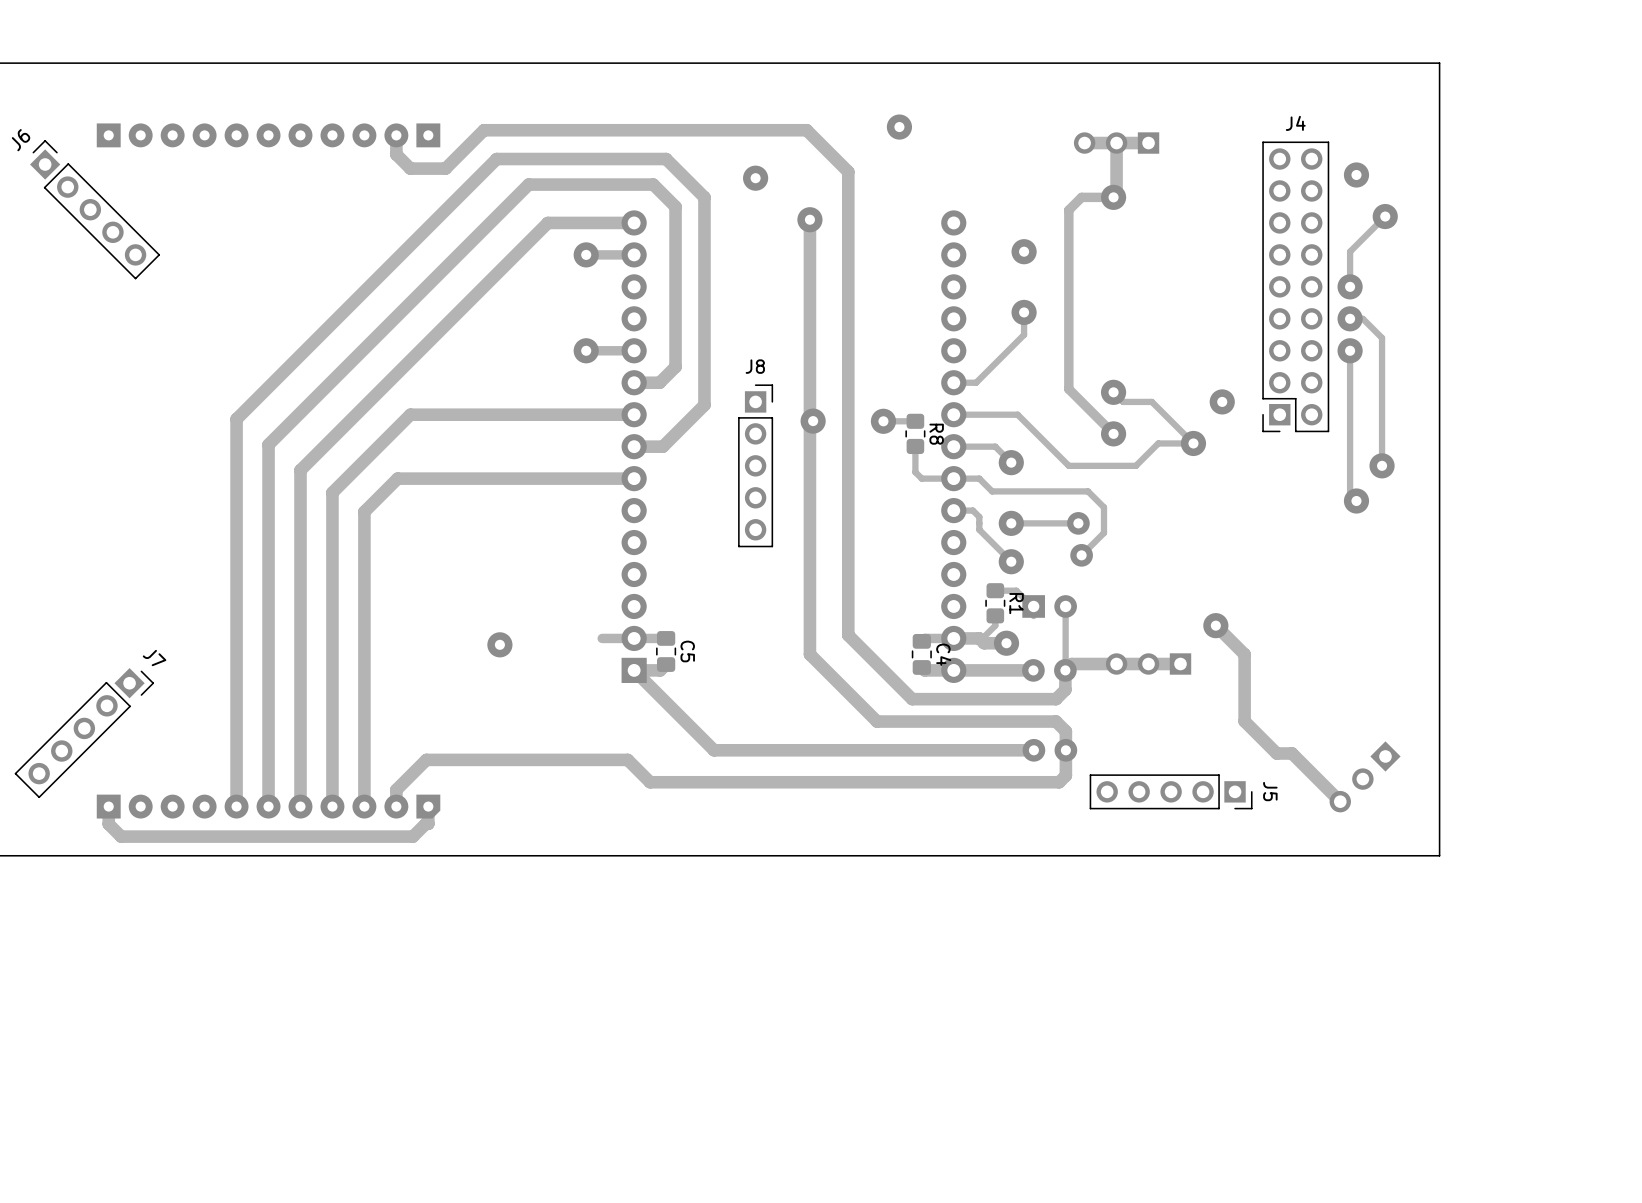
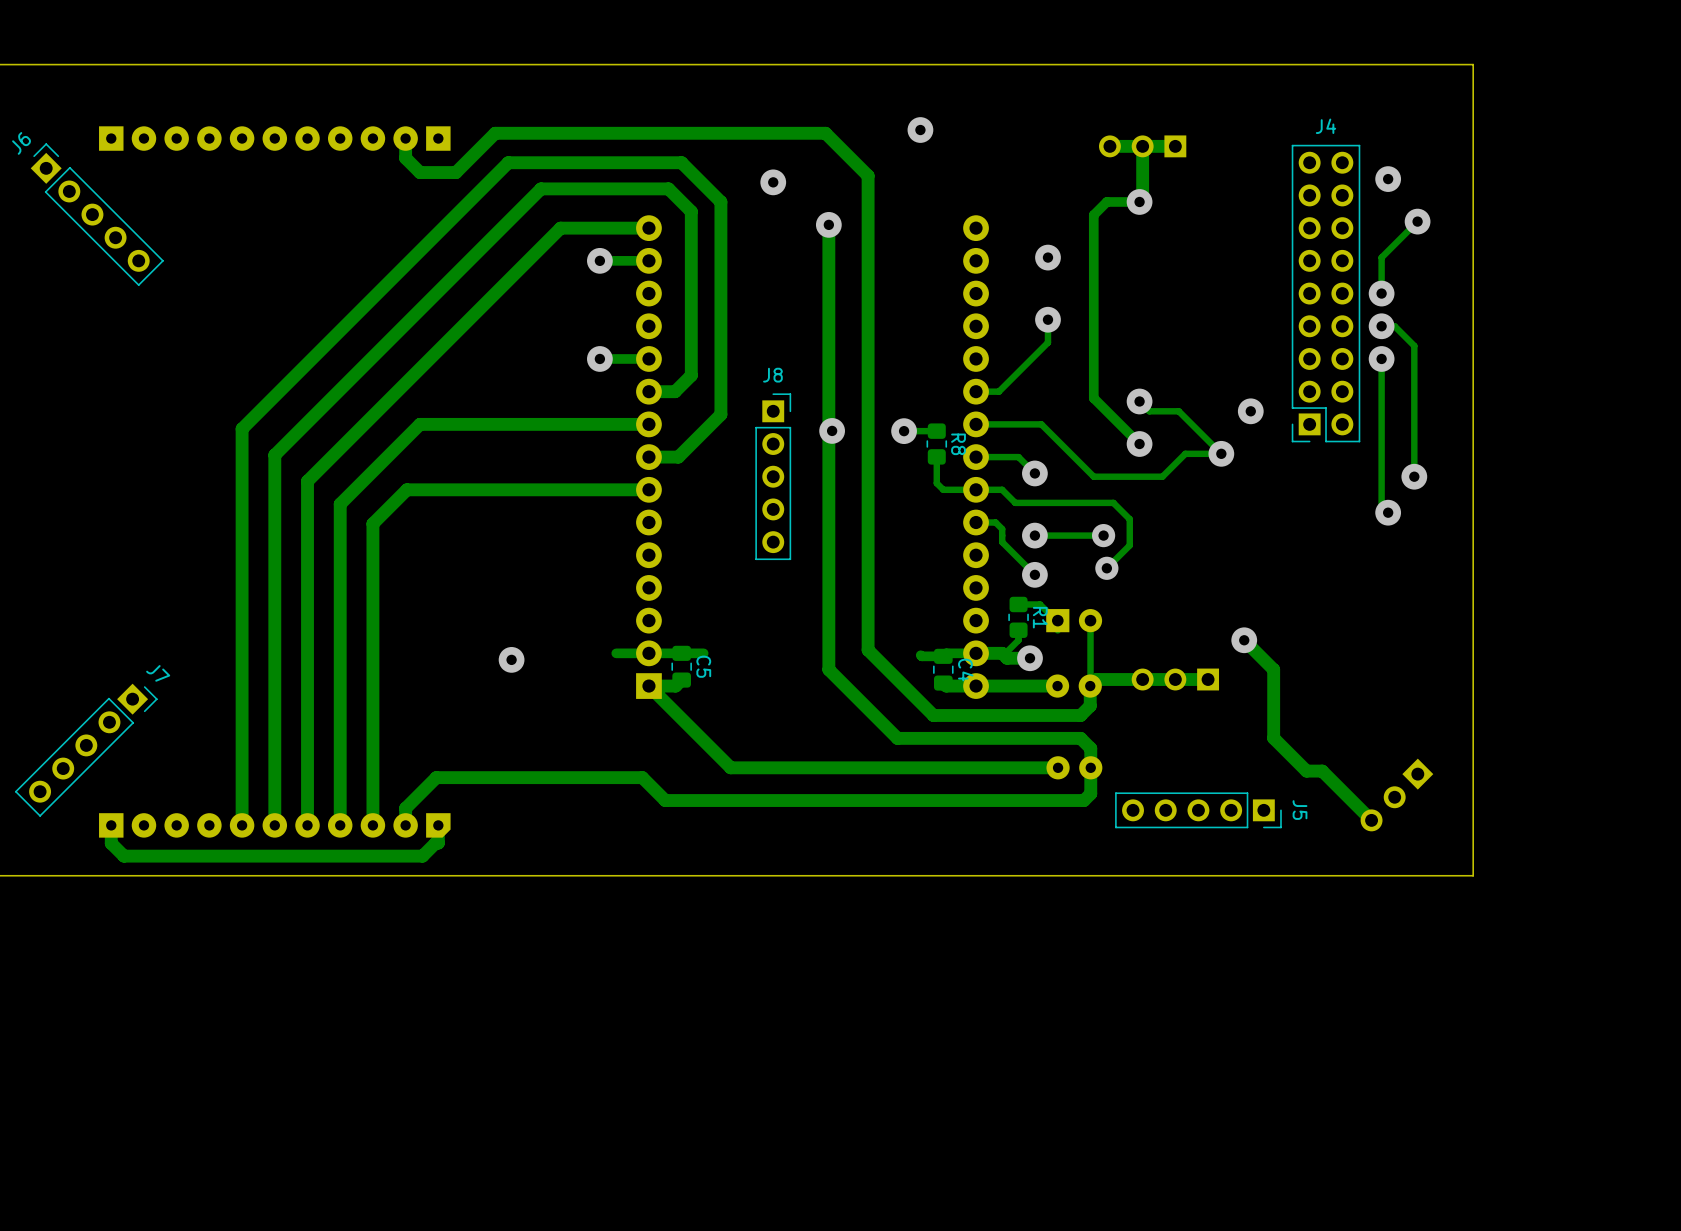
track: none -> (703, 653) (681, 653)
track: none -> (920, 655) (943, 656)

